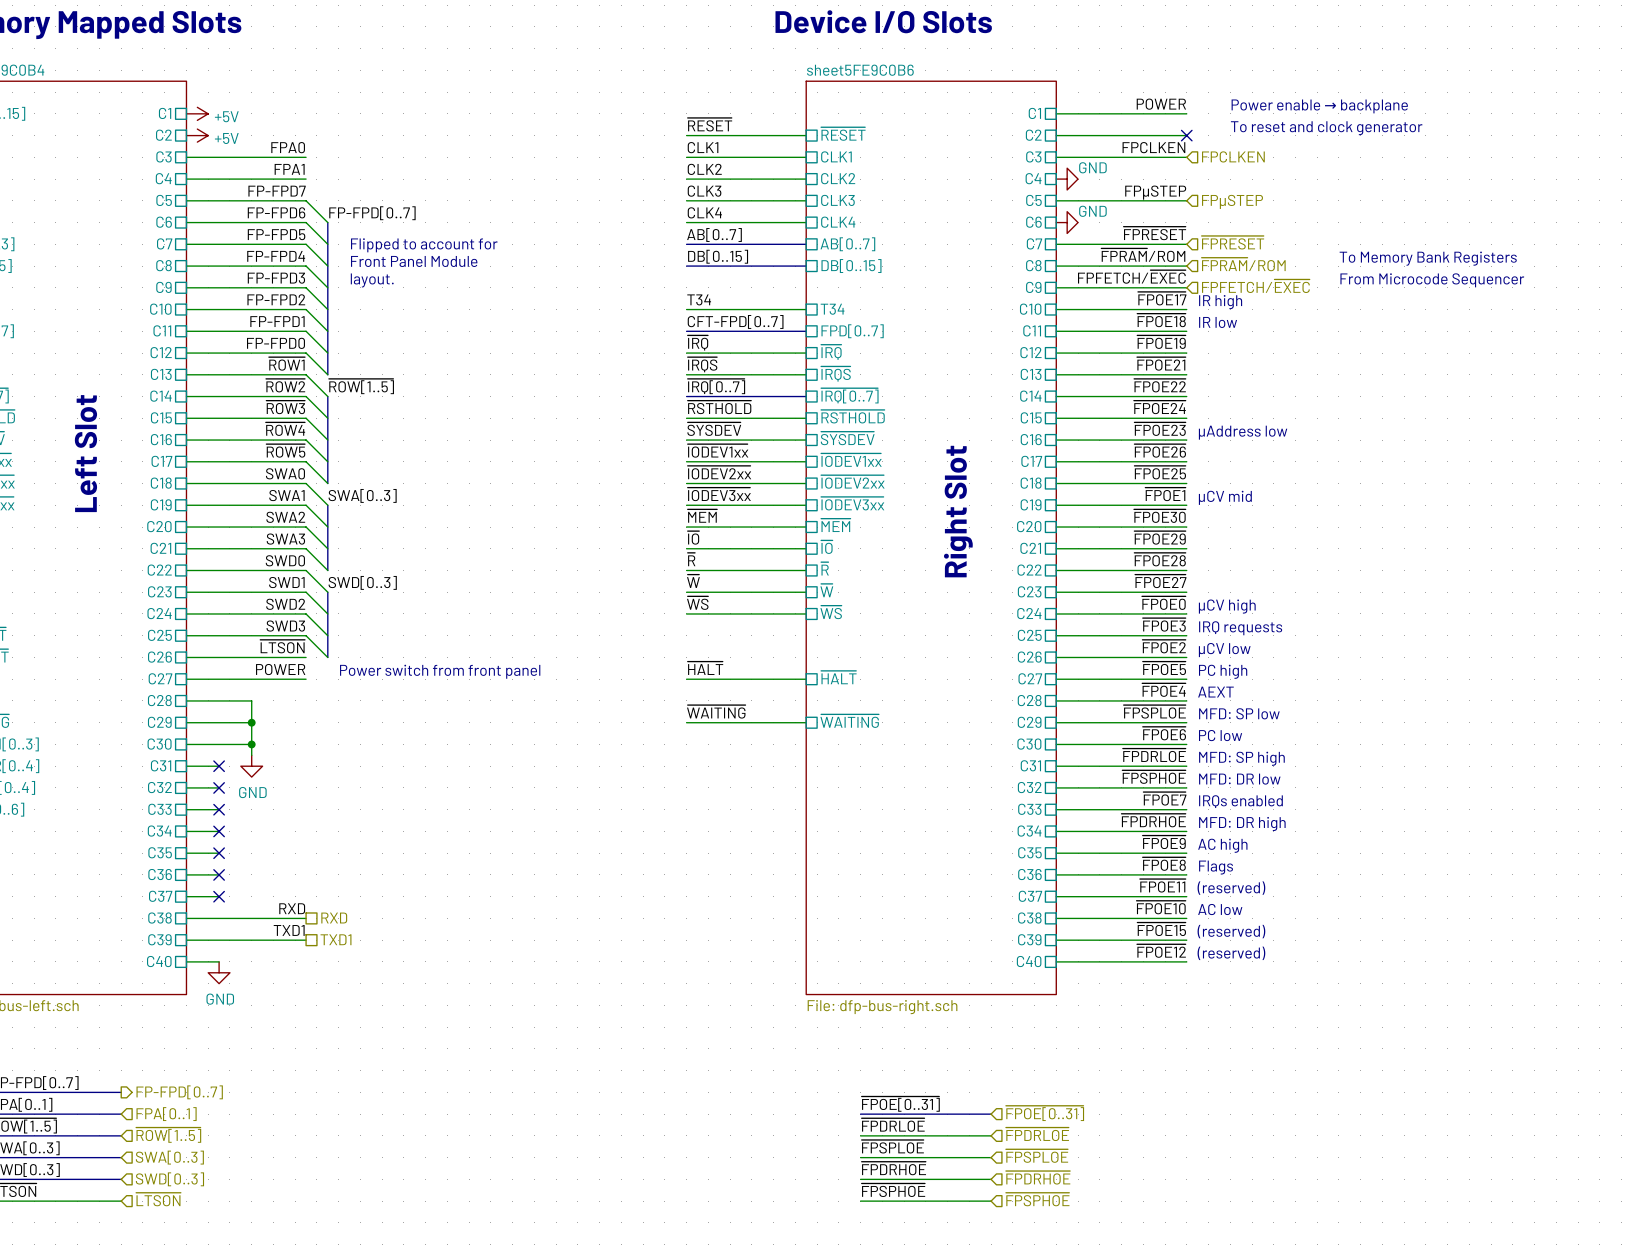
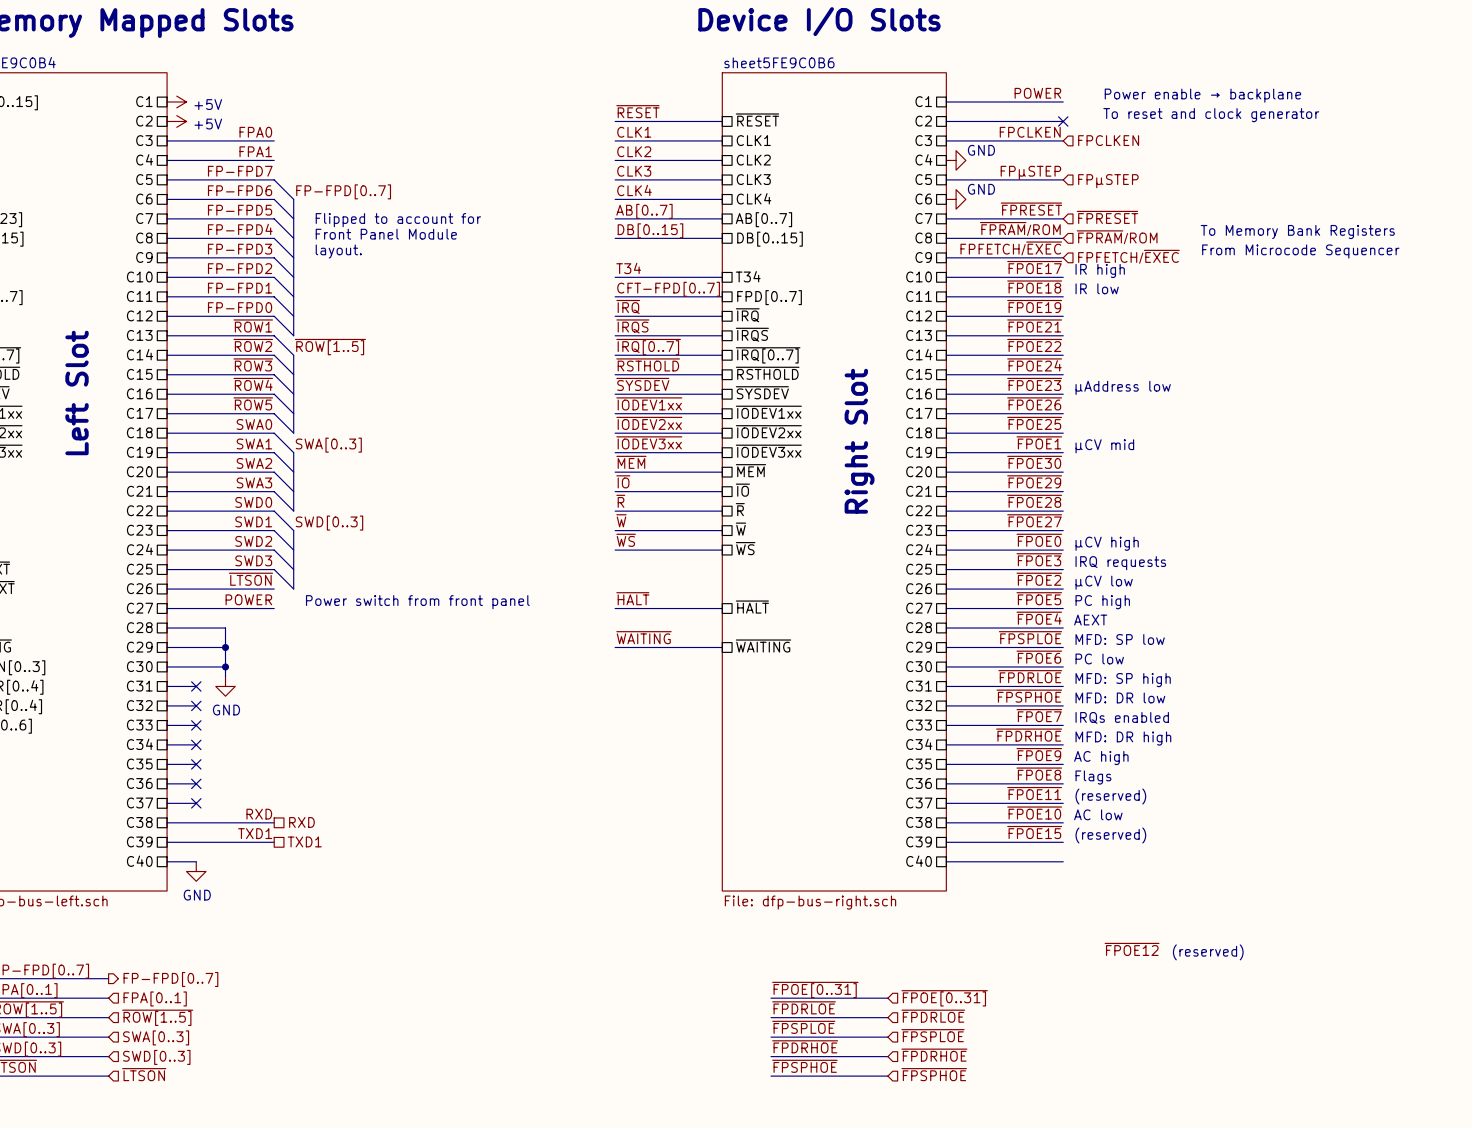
label position: ~{FPOE12} (1161, 951) -> ~{FPOE12} (1132, 949)
text position: (reserved) (1231, 953) -> (reserved) (1208, 952)

